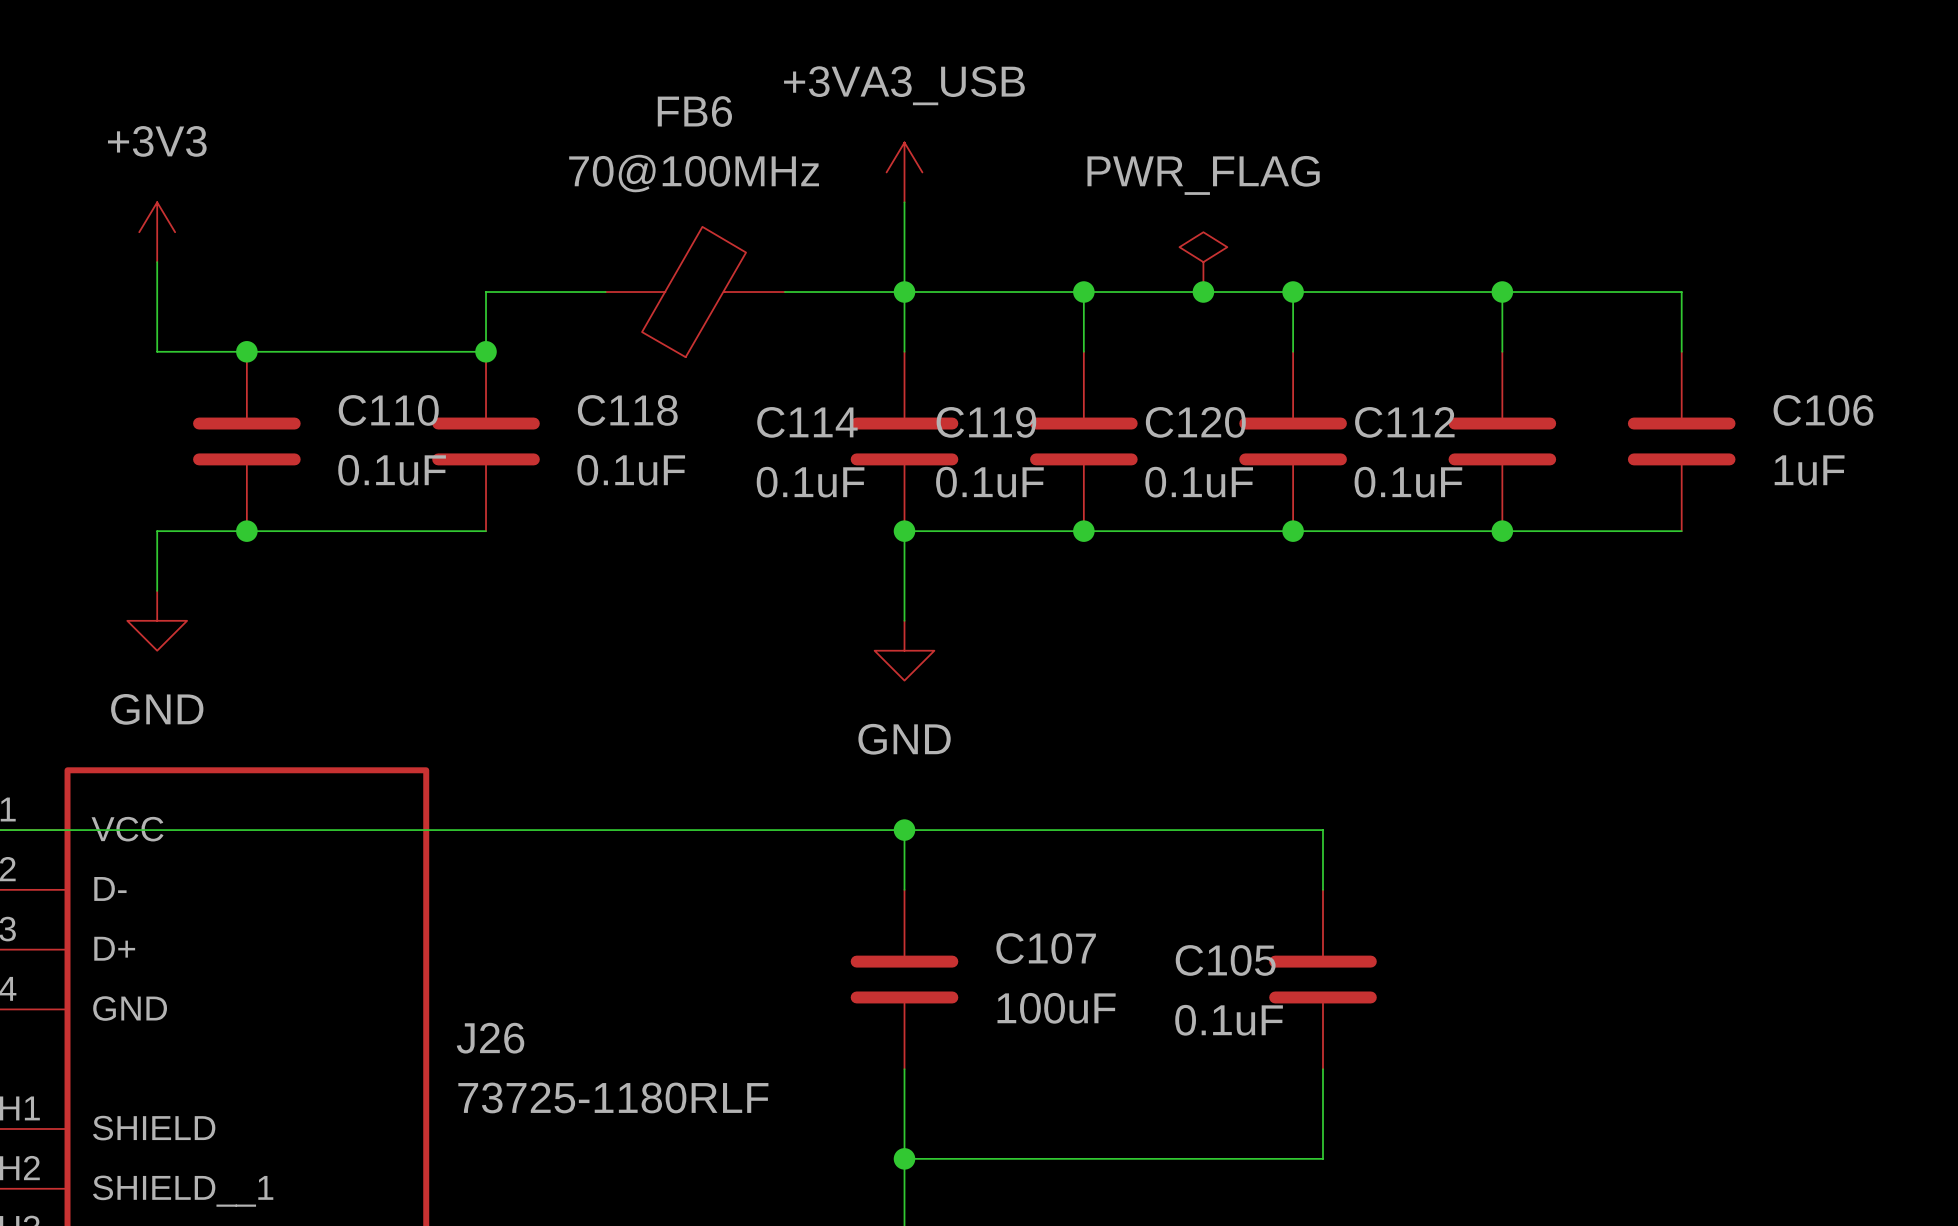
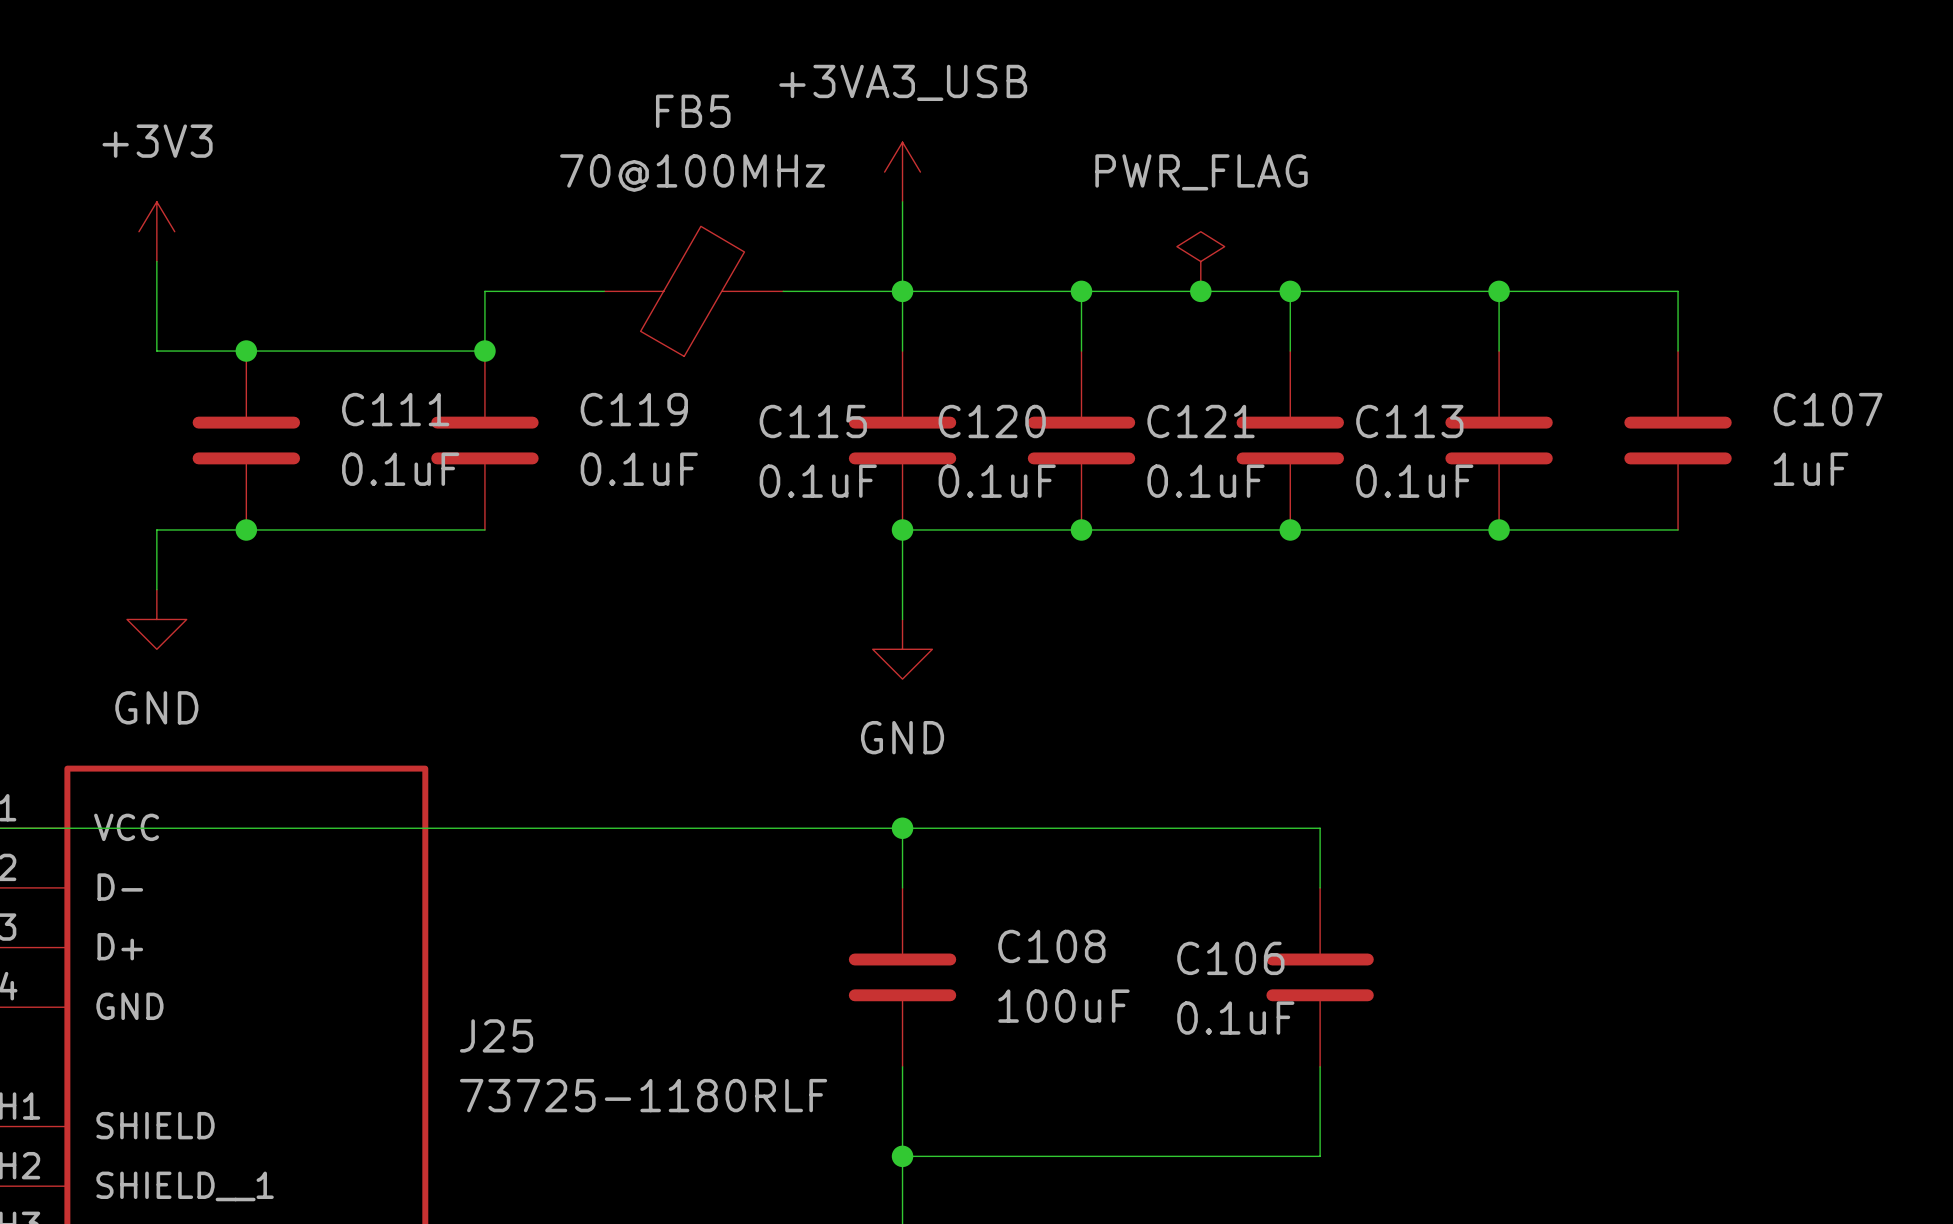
FB6 name: FB6 (694, 111) -> FB5 (693, 111)
C110 name: C110 (388, 410) -> C111 (395, 409)
C118 name: C118 (627, 410) -> C119 (634, 409)
C106 name: C106 (1823, 410) -> C107 (1828, 409)
C114 name: C114 (807, 422) -> C115 (813, 421)
C119 name: C119 (986, 422) -> C120 (992, 421)
C120 name: C120 (1195, 422) -> C121 (1201, 421)
C112 name: C112 (1404, 422) -> C113 (1409, 421)
C107 name: C107 (1046, 948) -> C108 (1051, 946)
C105 name: C105 (1225, 960) -> C106 (1230, 958)
J26 name: J26 (490, 1038) -> J25 (496, 1035)

